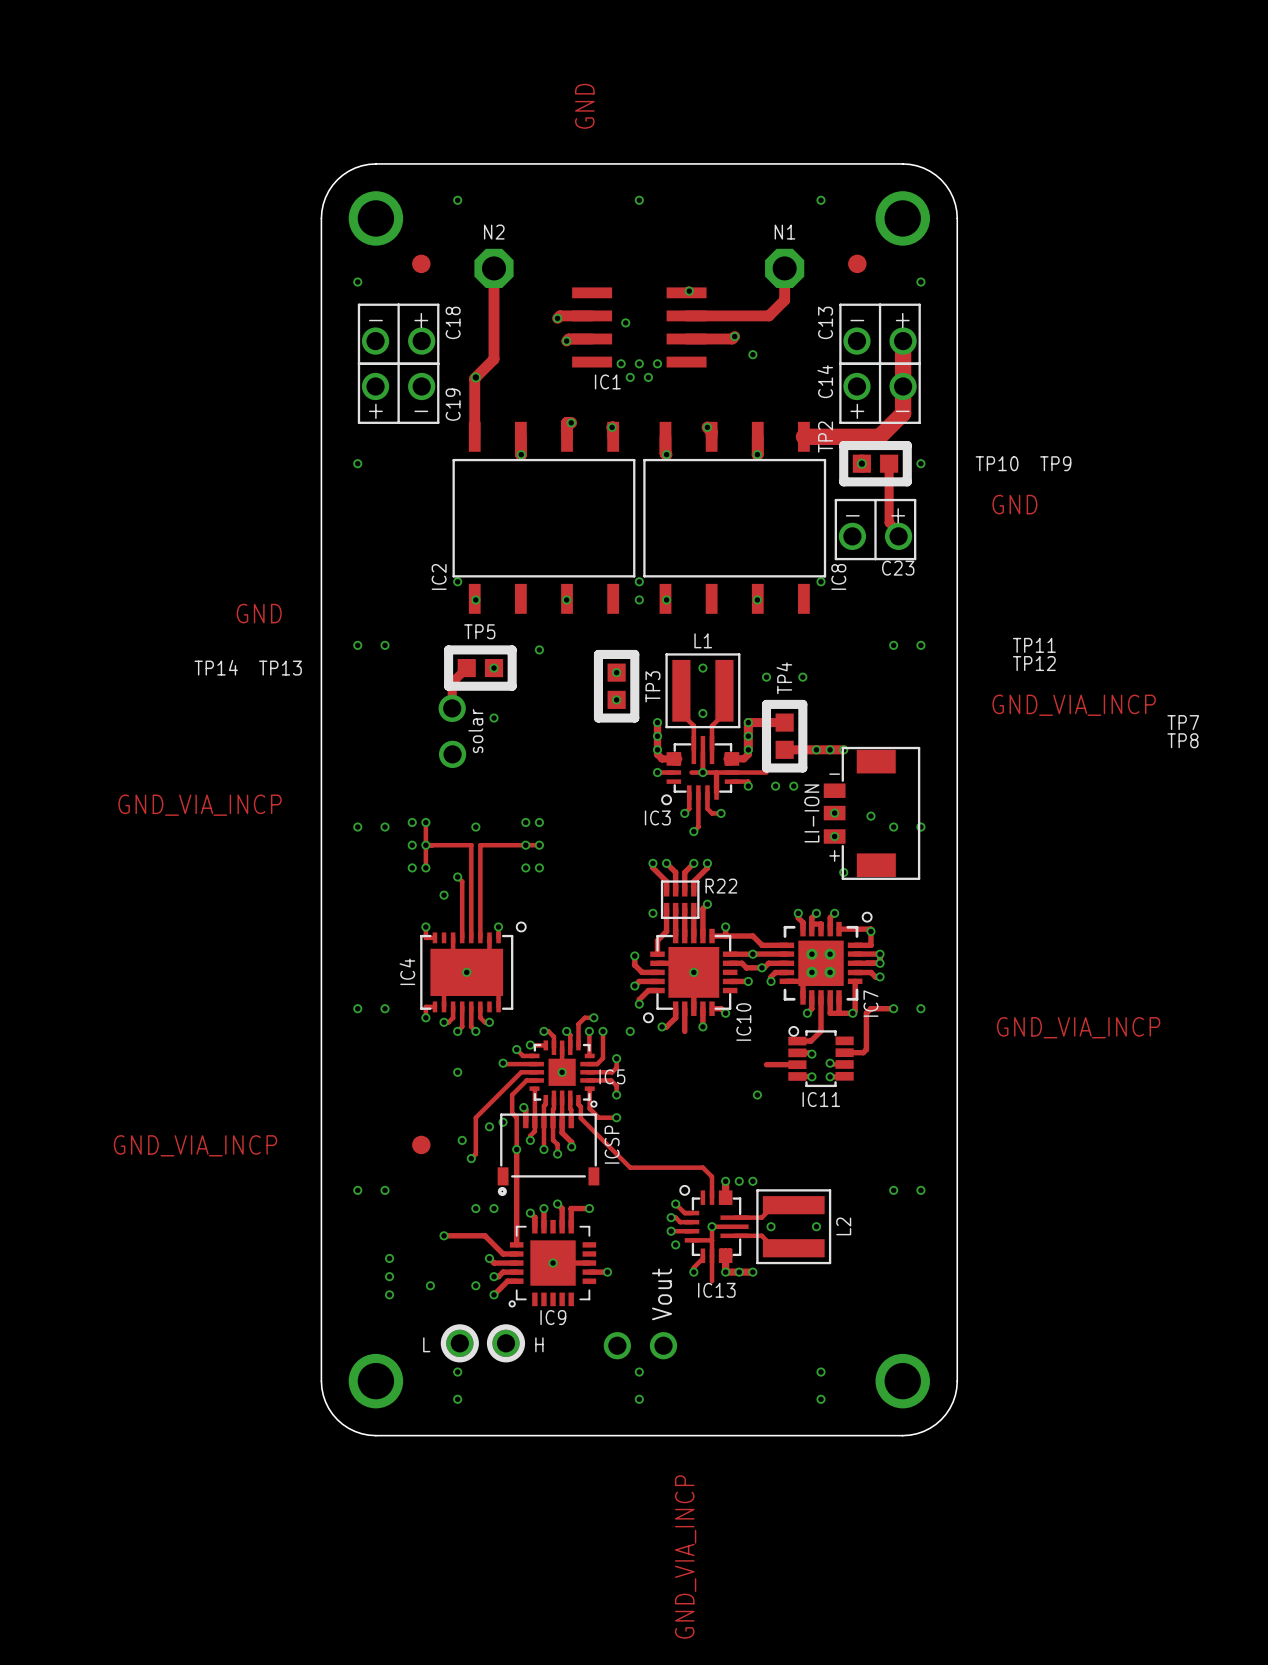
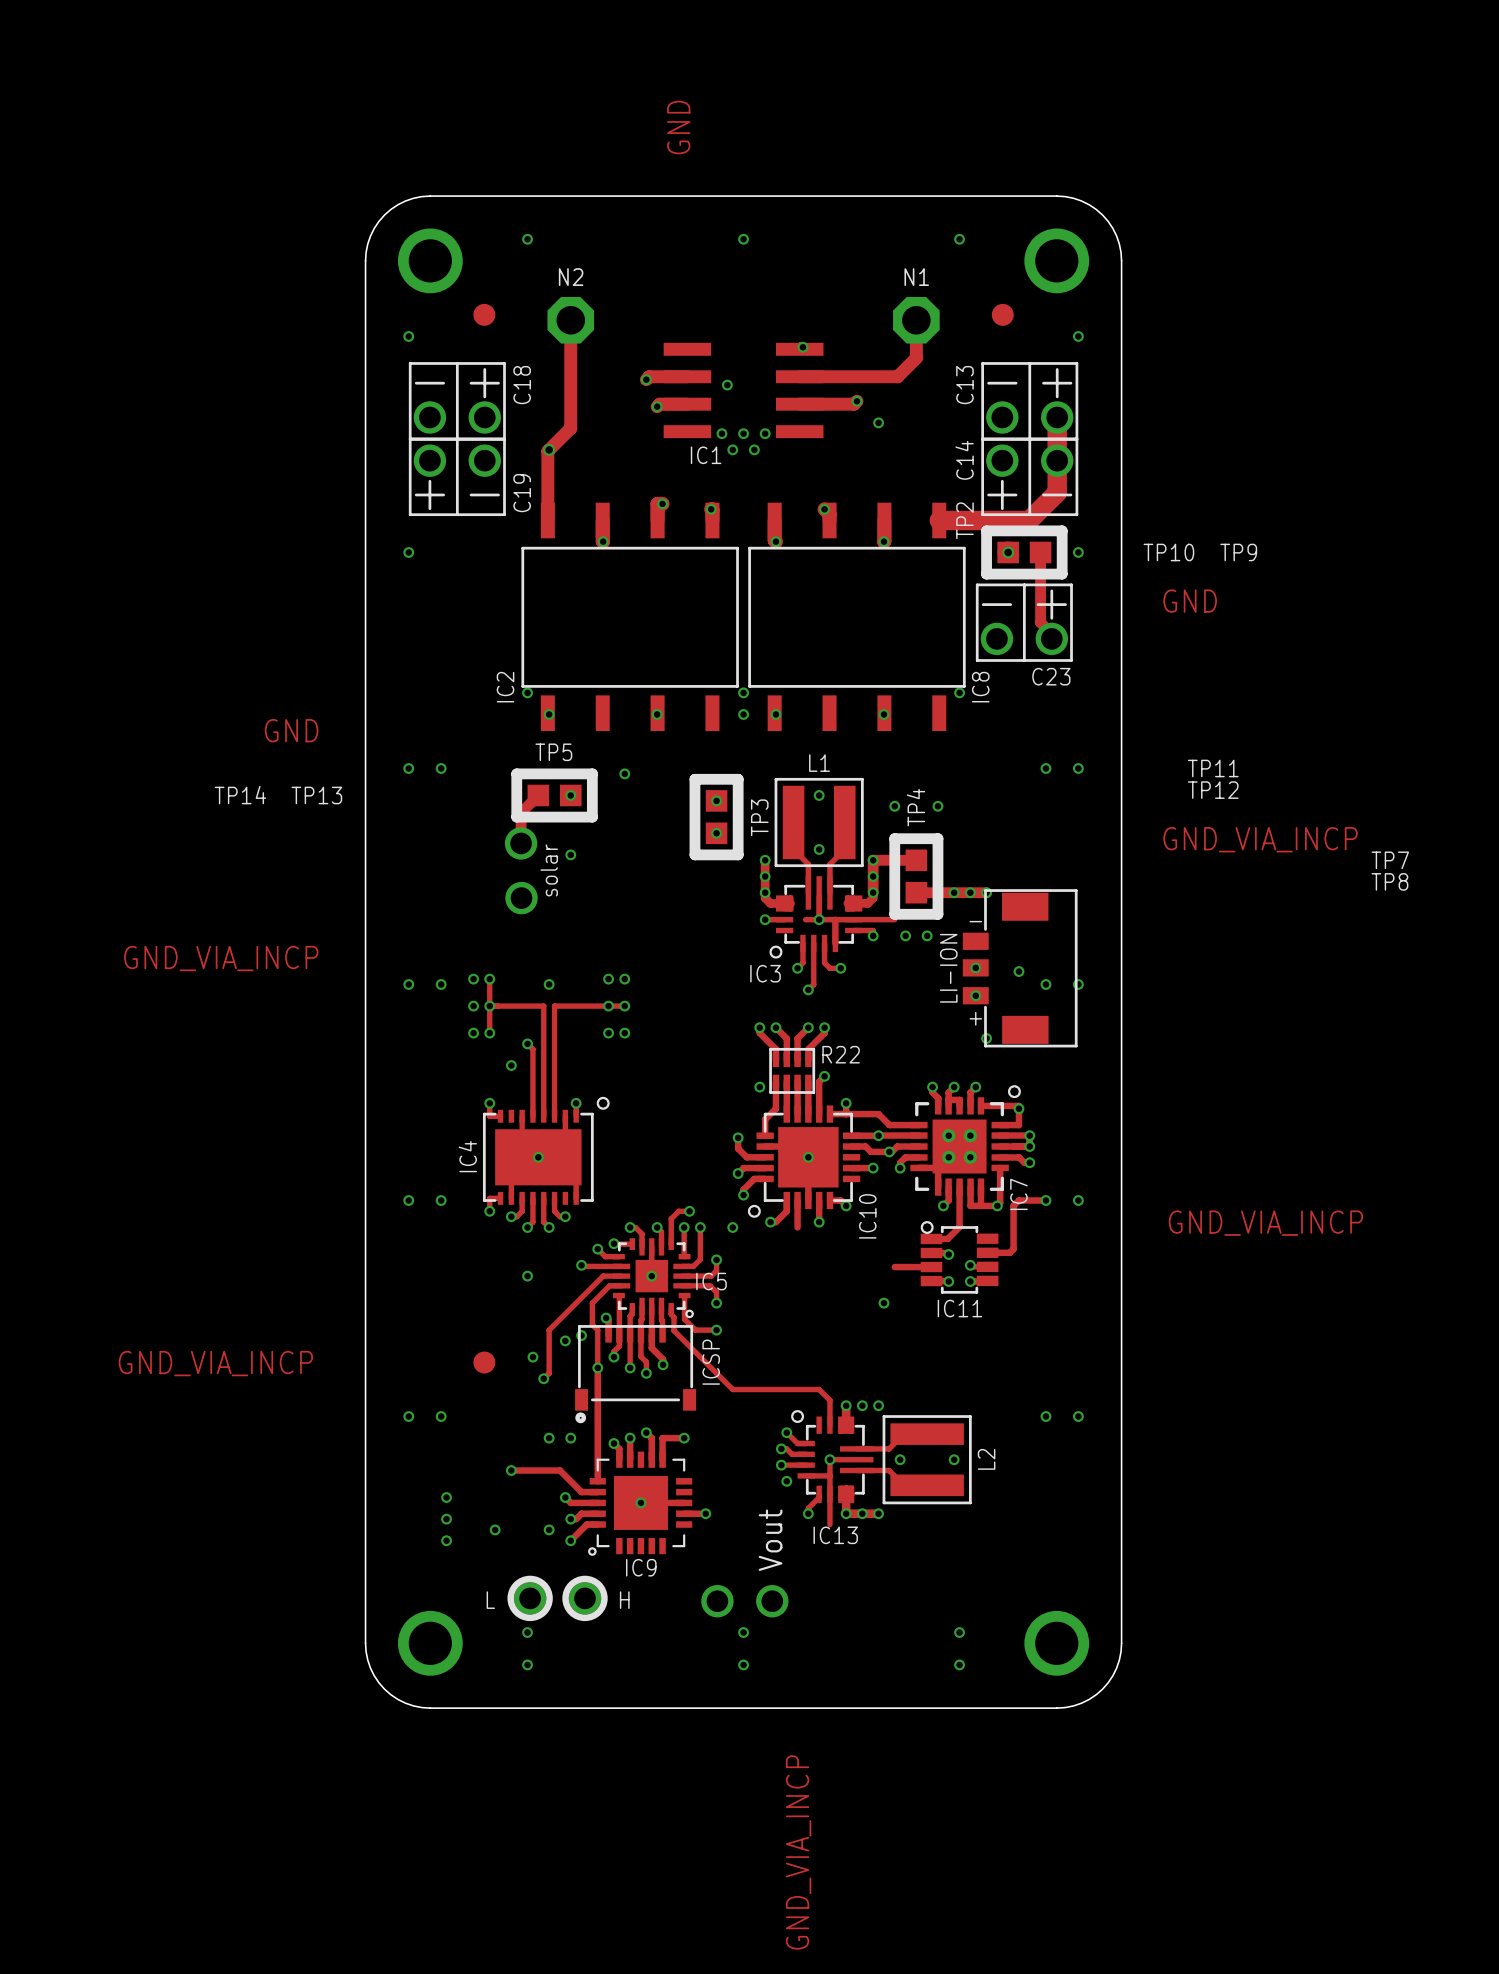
C18 footprint: [357, 303, 440, 365] -> [408, 362, 506, 441]
C14 footprint: [839, 303, 921, 365] -> [981, 362, 1079, 441]
C19 footprint: [357, 362, 440, 424] -> [408, 437, 506, 517]
C13 footprint: [839, 362, 921, 424] -> [981, 437, 1079, 517]
C23 footprint: [834, 498, 917, 561] -> [975, 583, 1073, 662]

